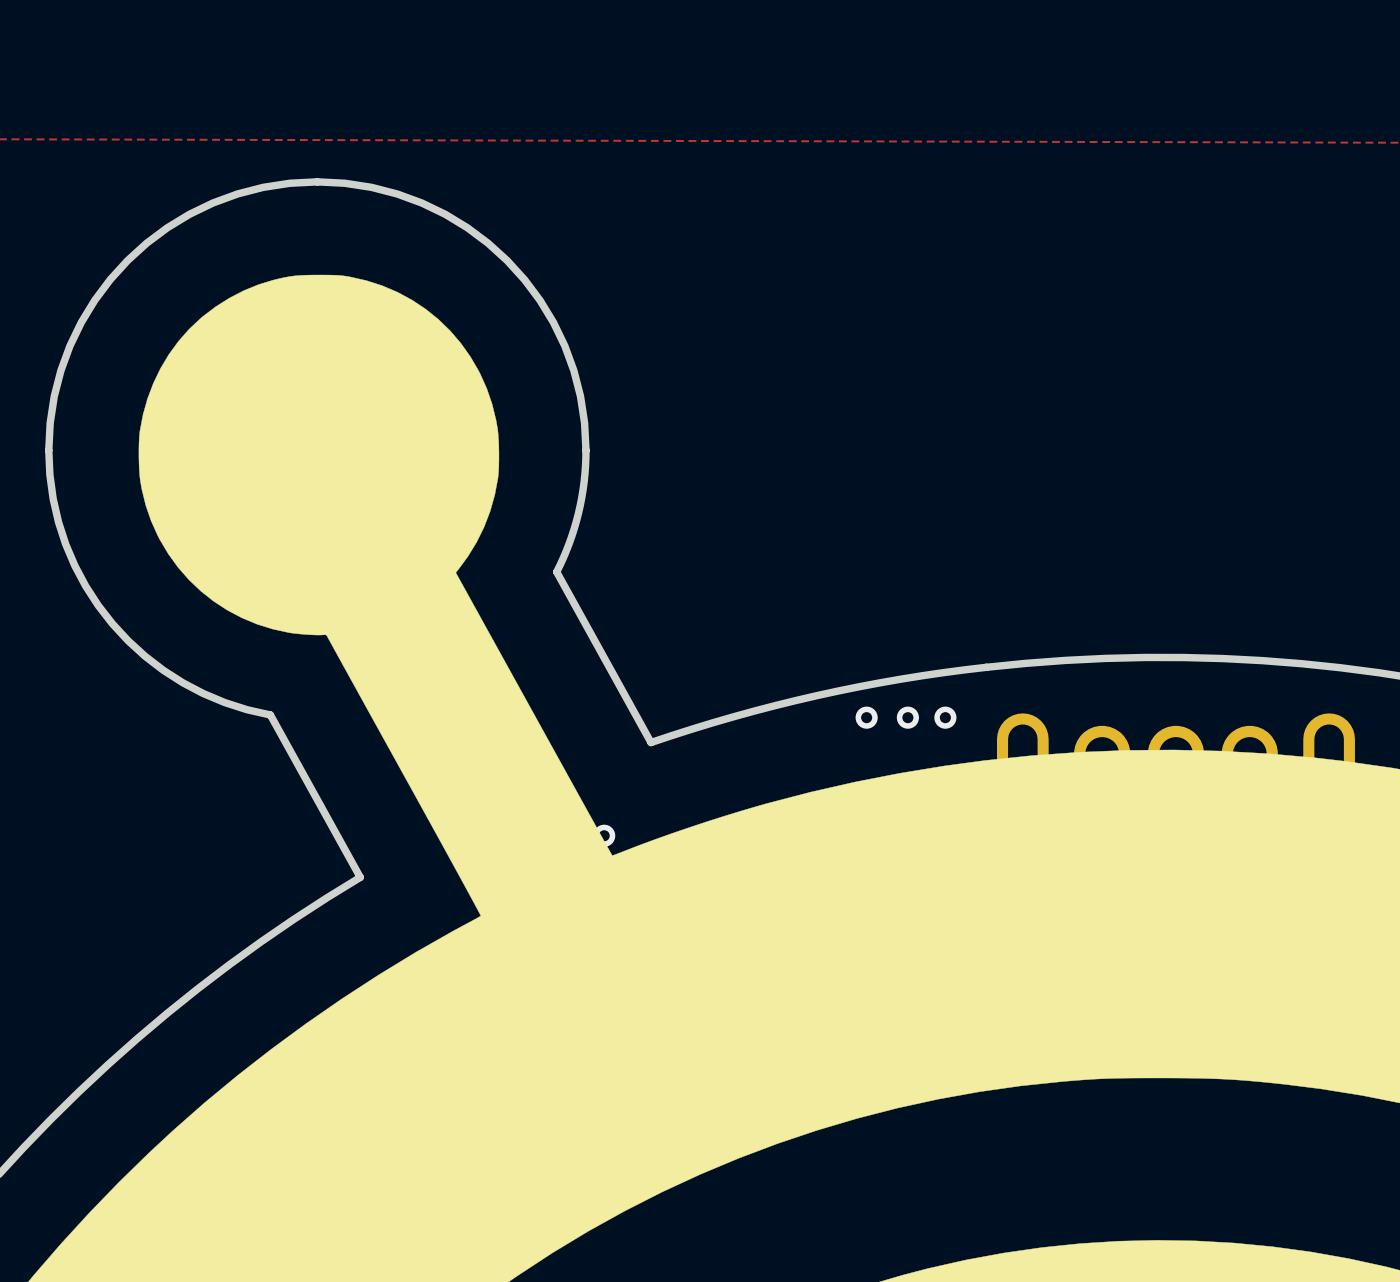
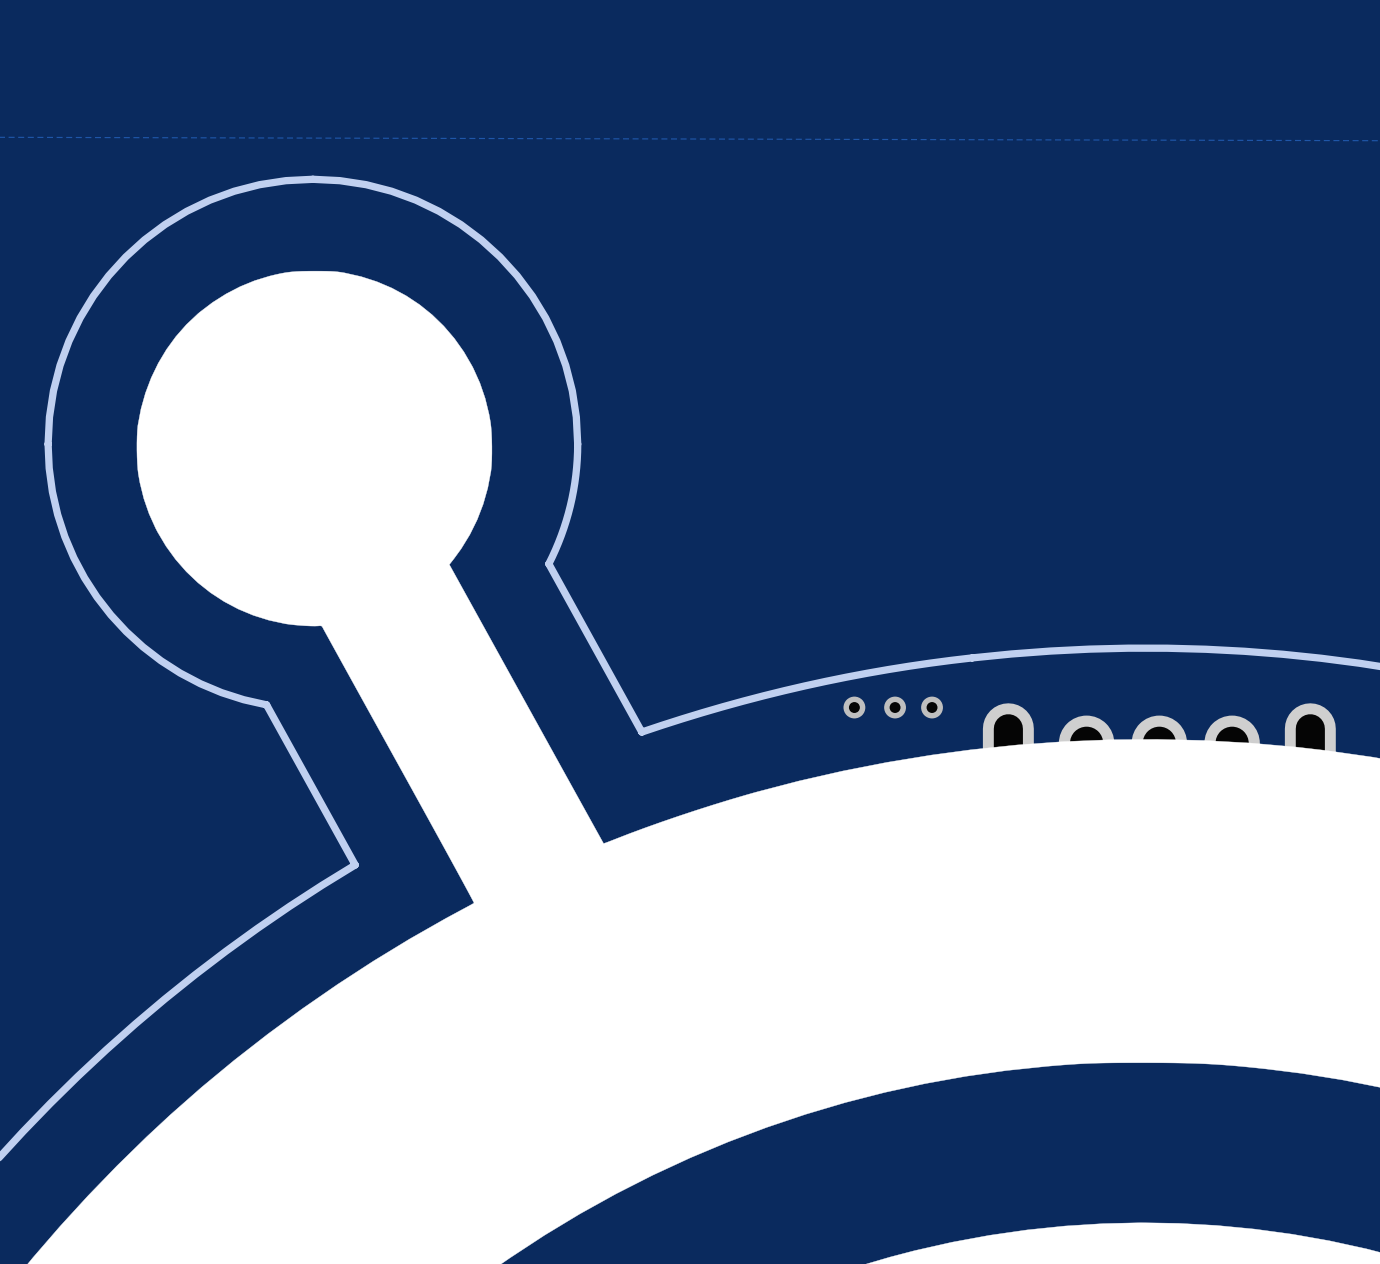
via: (604, 835) -> none

